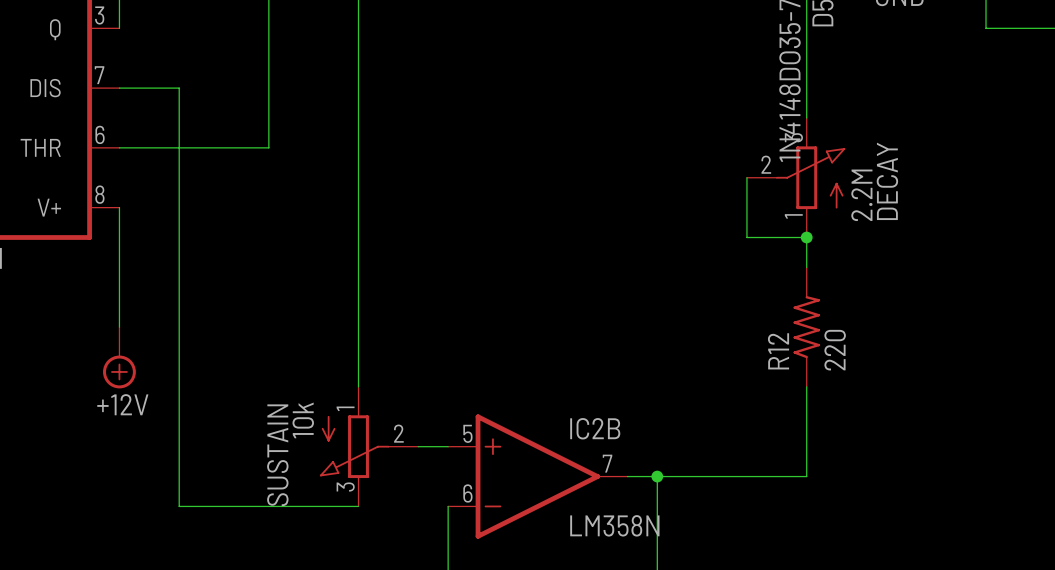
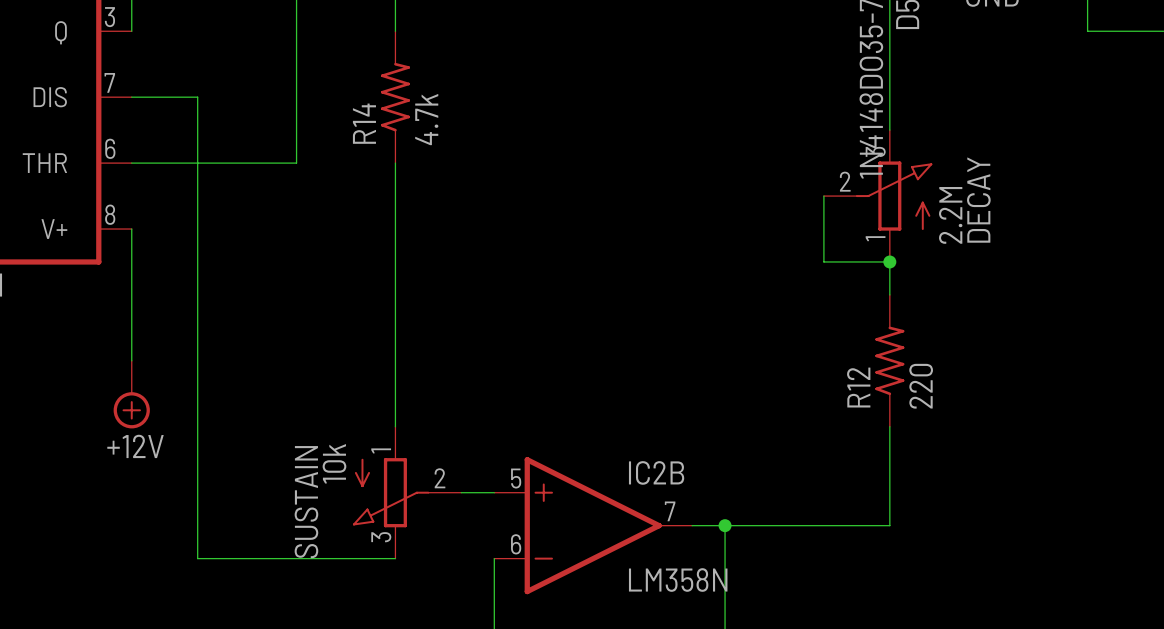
R14: none -> 4.7k (395, 97)

